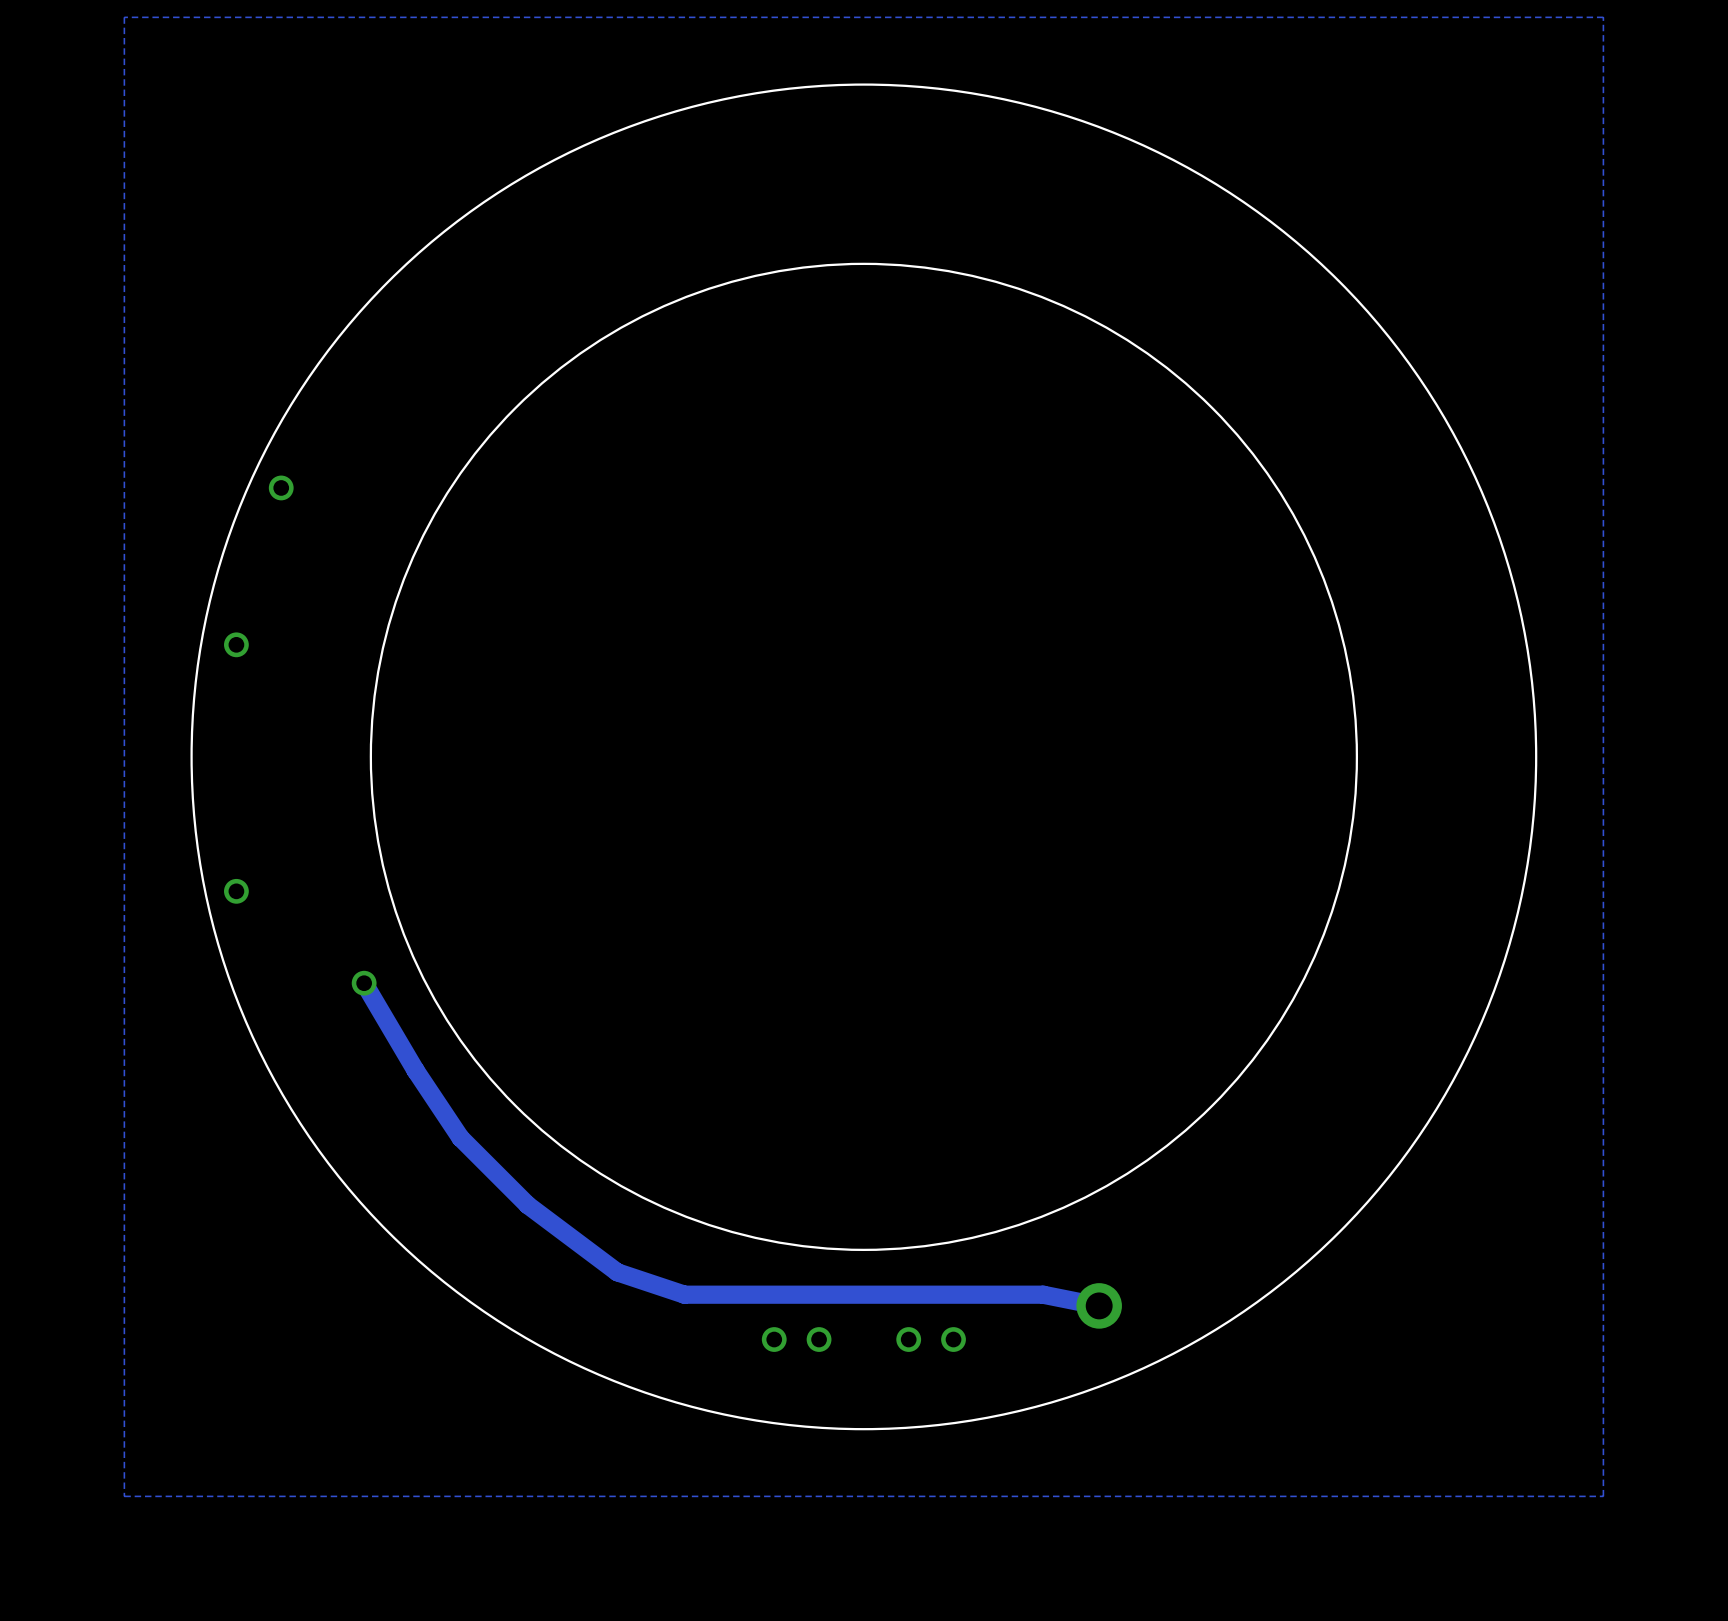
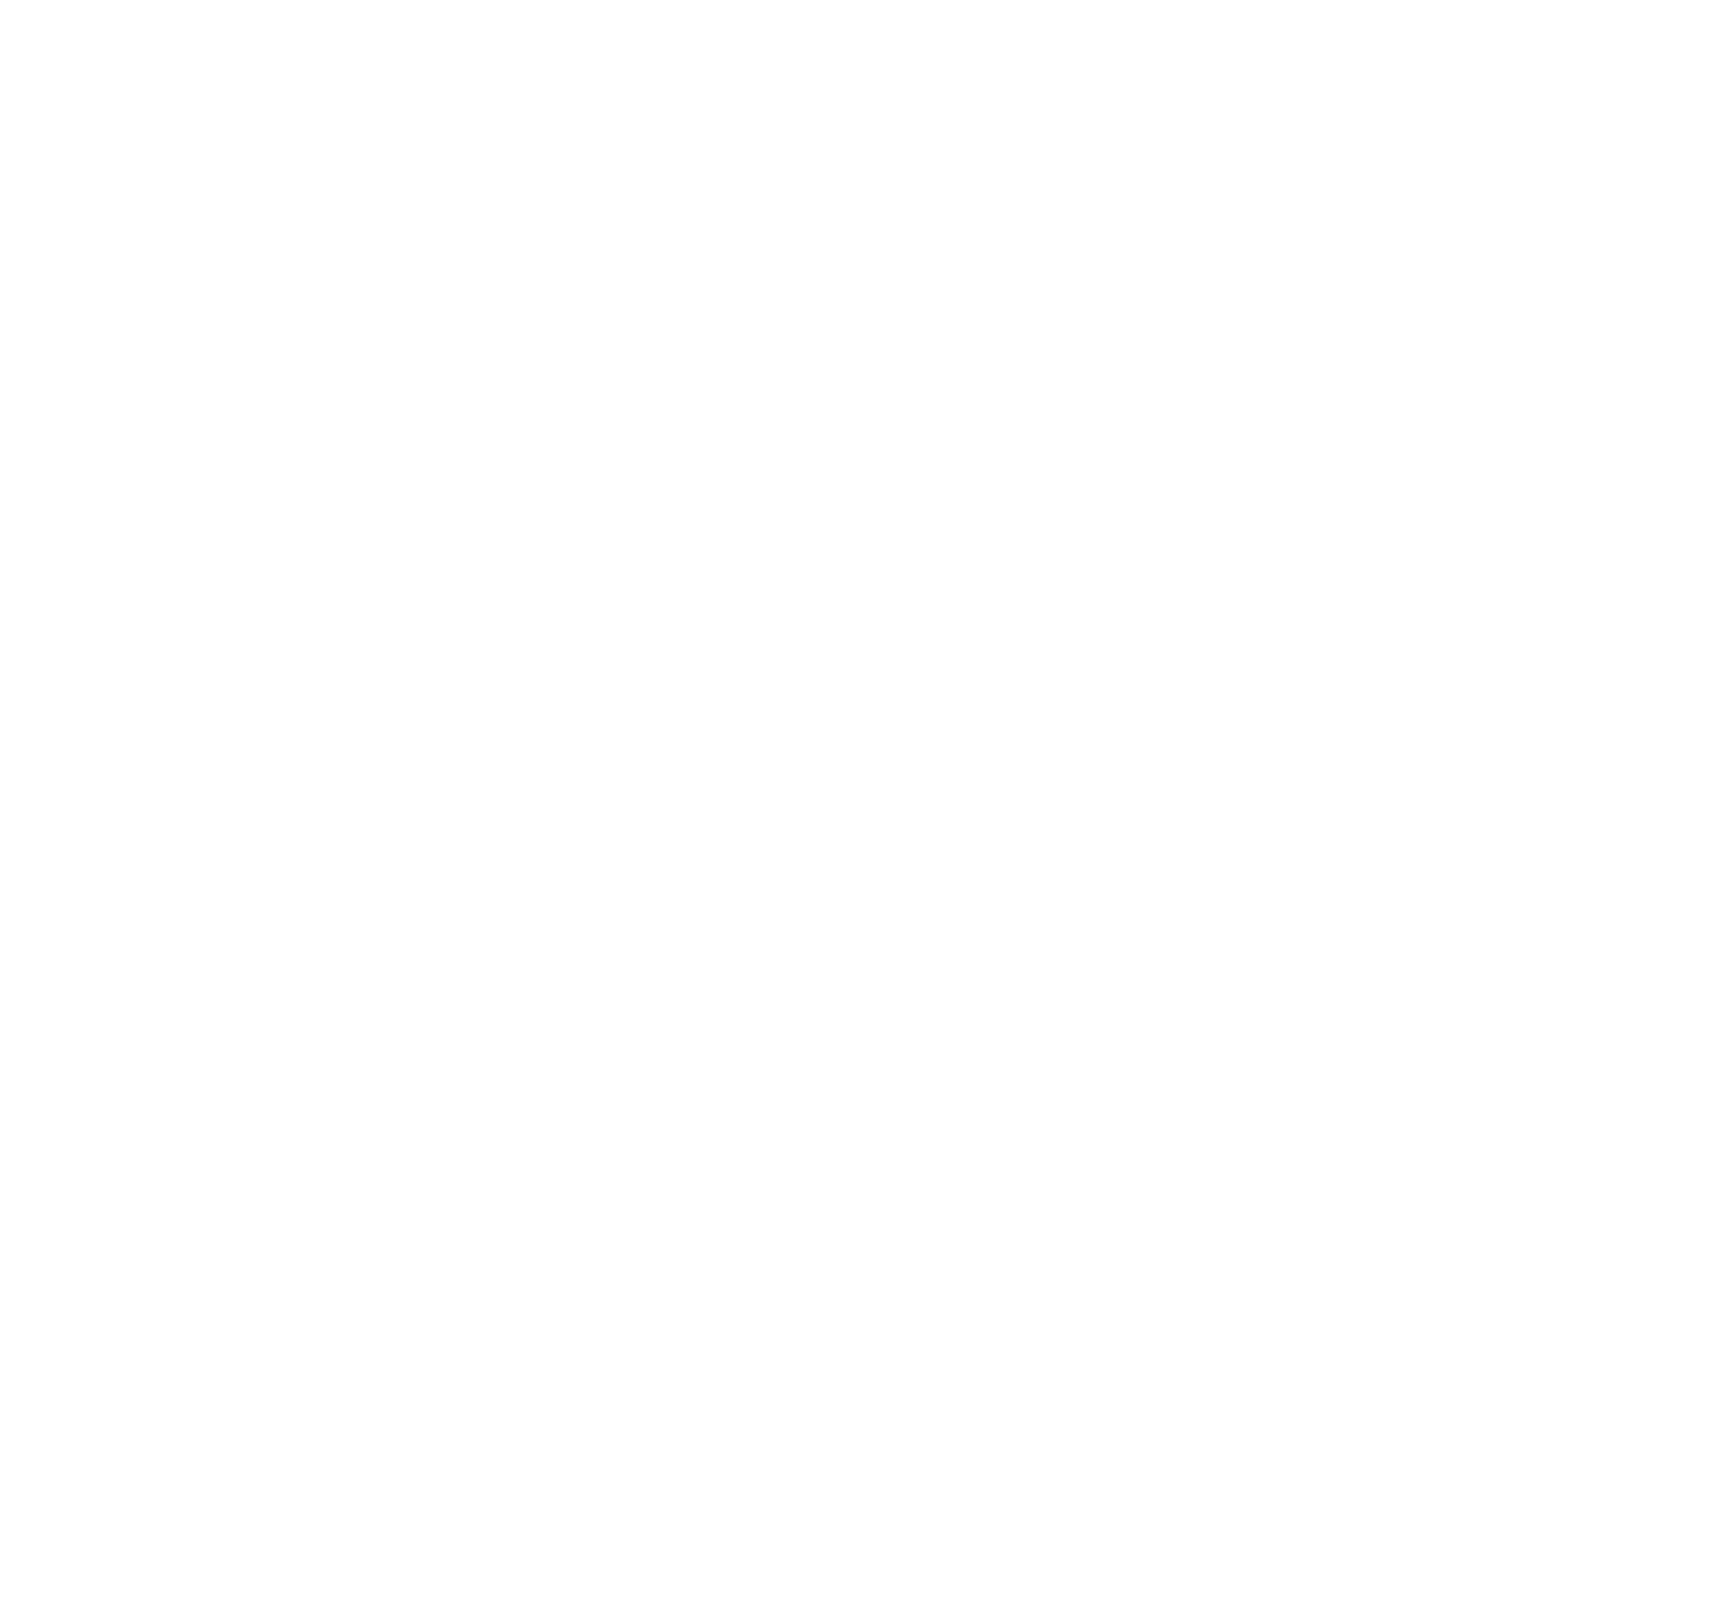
zone outline: (1603, 17) (124, 17) (124, 1496) (1603, 1496) (1603, 17) -> none
round board edge: [190, 83, 1538, 1431] -> none
round board edge: [369, 262, 1359, 1252] -> none
via: (281, 487) -> none
via: (236, 644) -> none
via: (236, 891) -> none
track: (364, 983) (415, 1070) (460, 1137) (527, 1205) (617, 1272) (684, 1294) (1043, 1294) (1099, 1305) -> none
via: (364, 983) -> none
part: (1099, 1305) -> none
via: (774, 1339) -> none
via: (819, 1339) -> none
via: (908, 1339) -> none
via: (953, 1339) -> none

